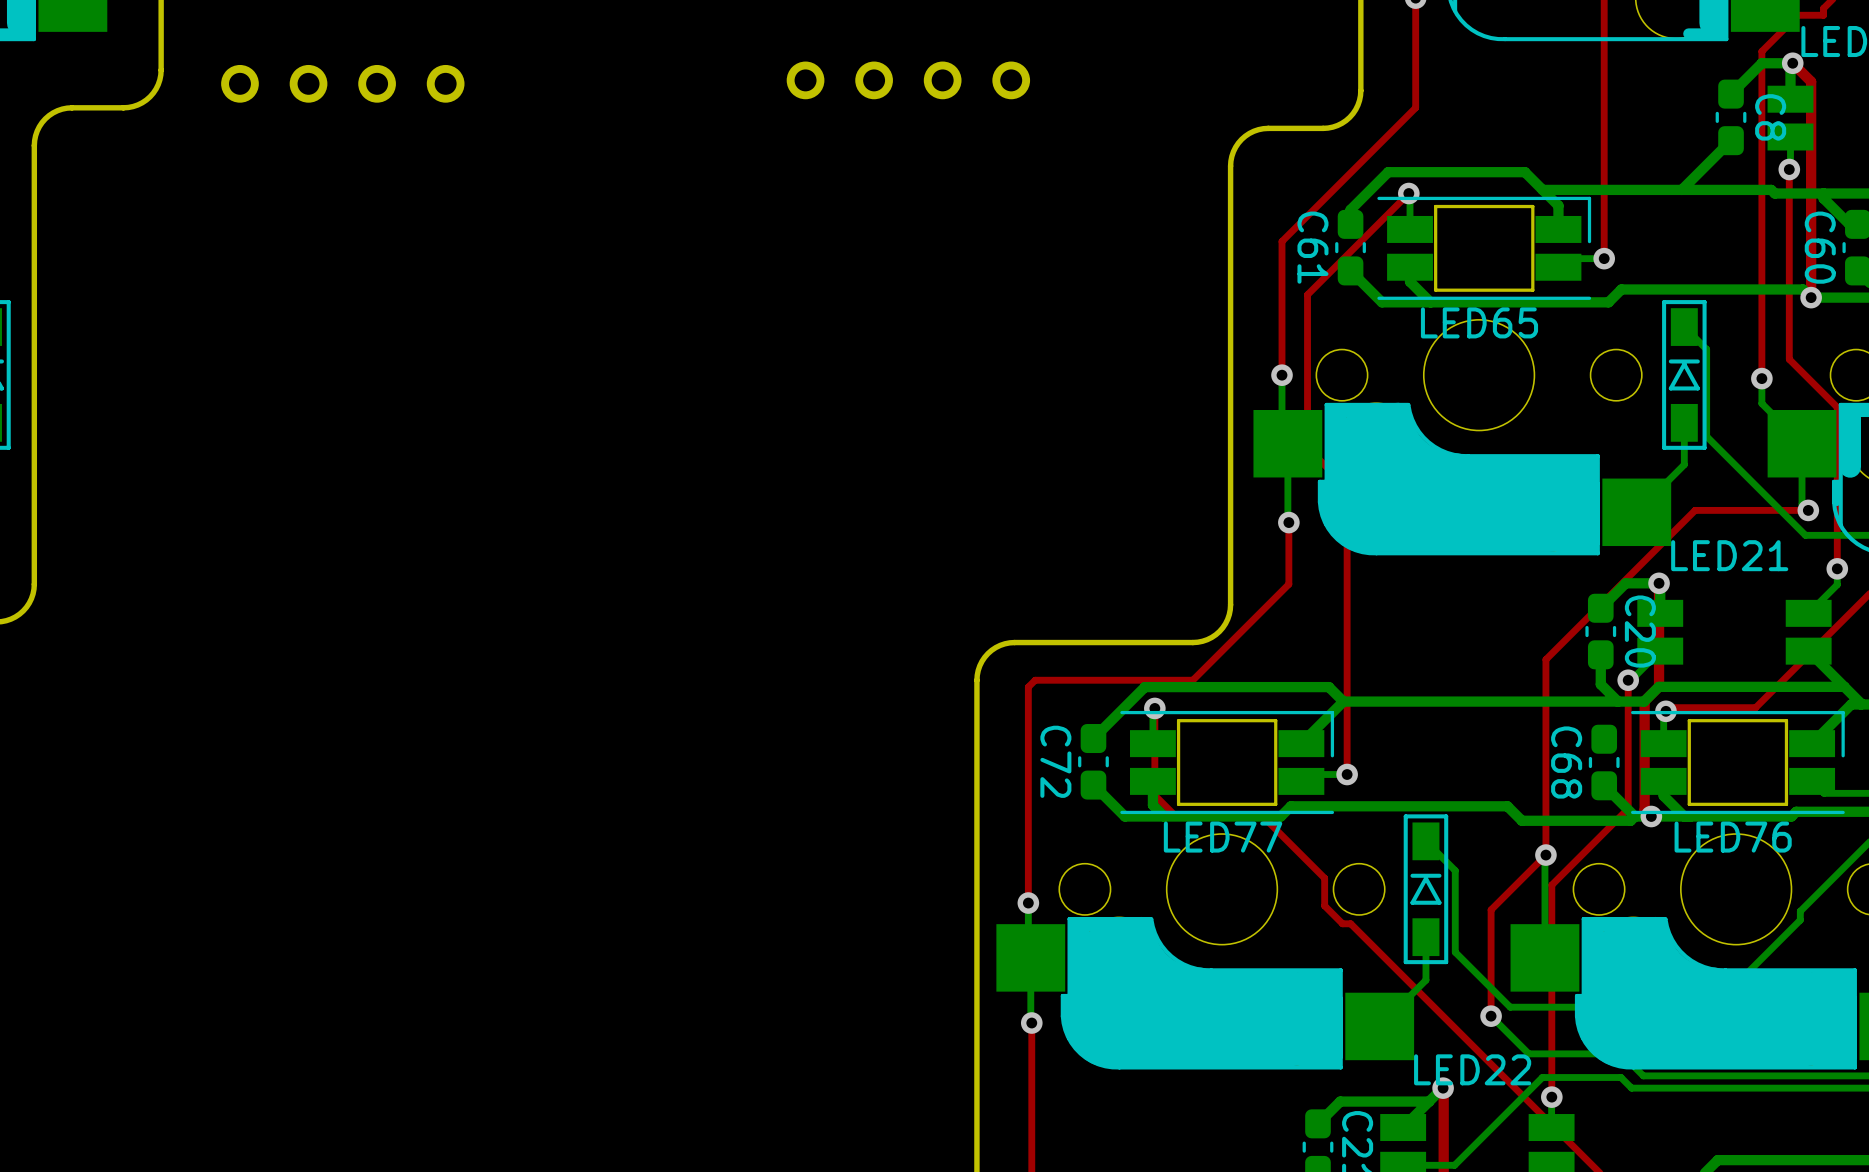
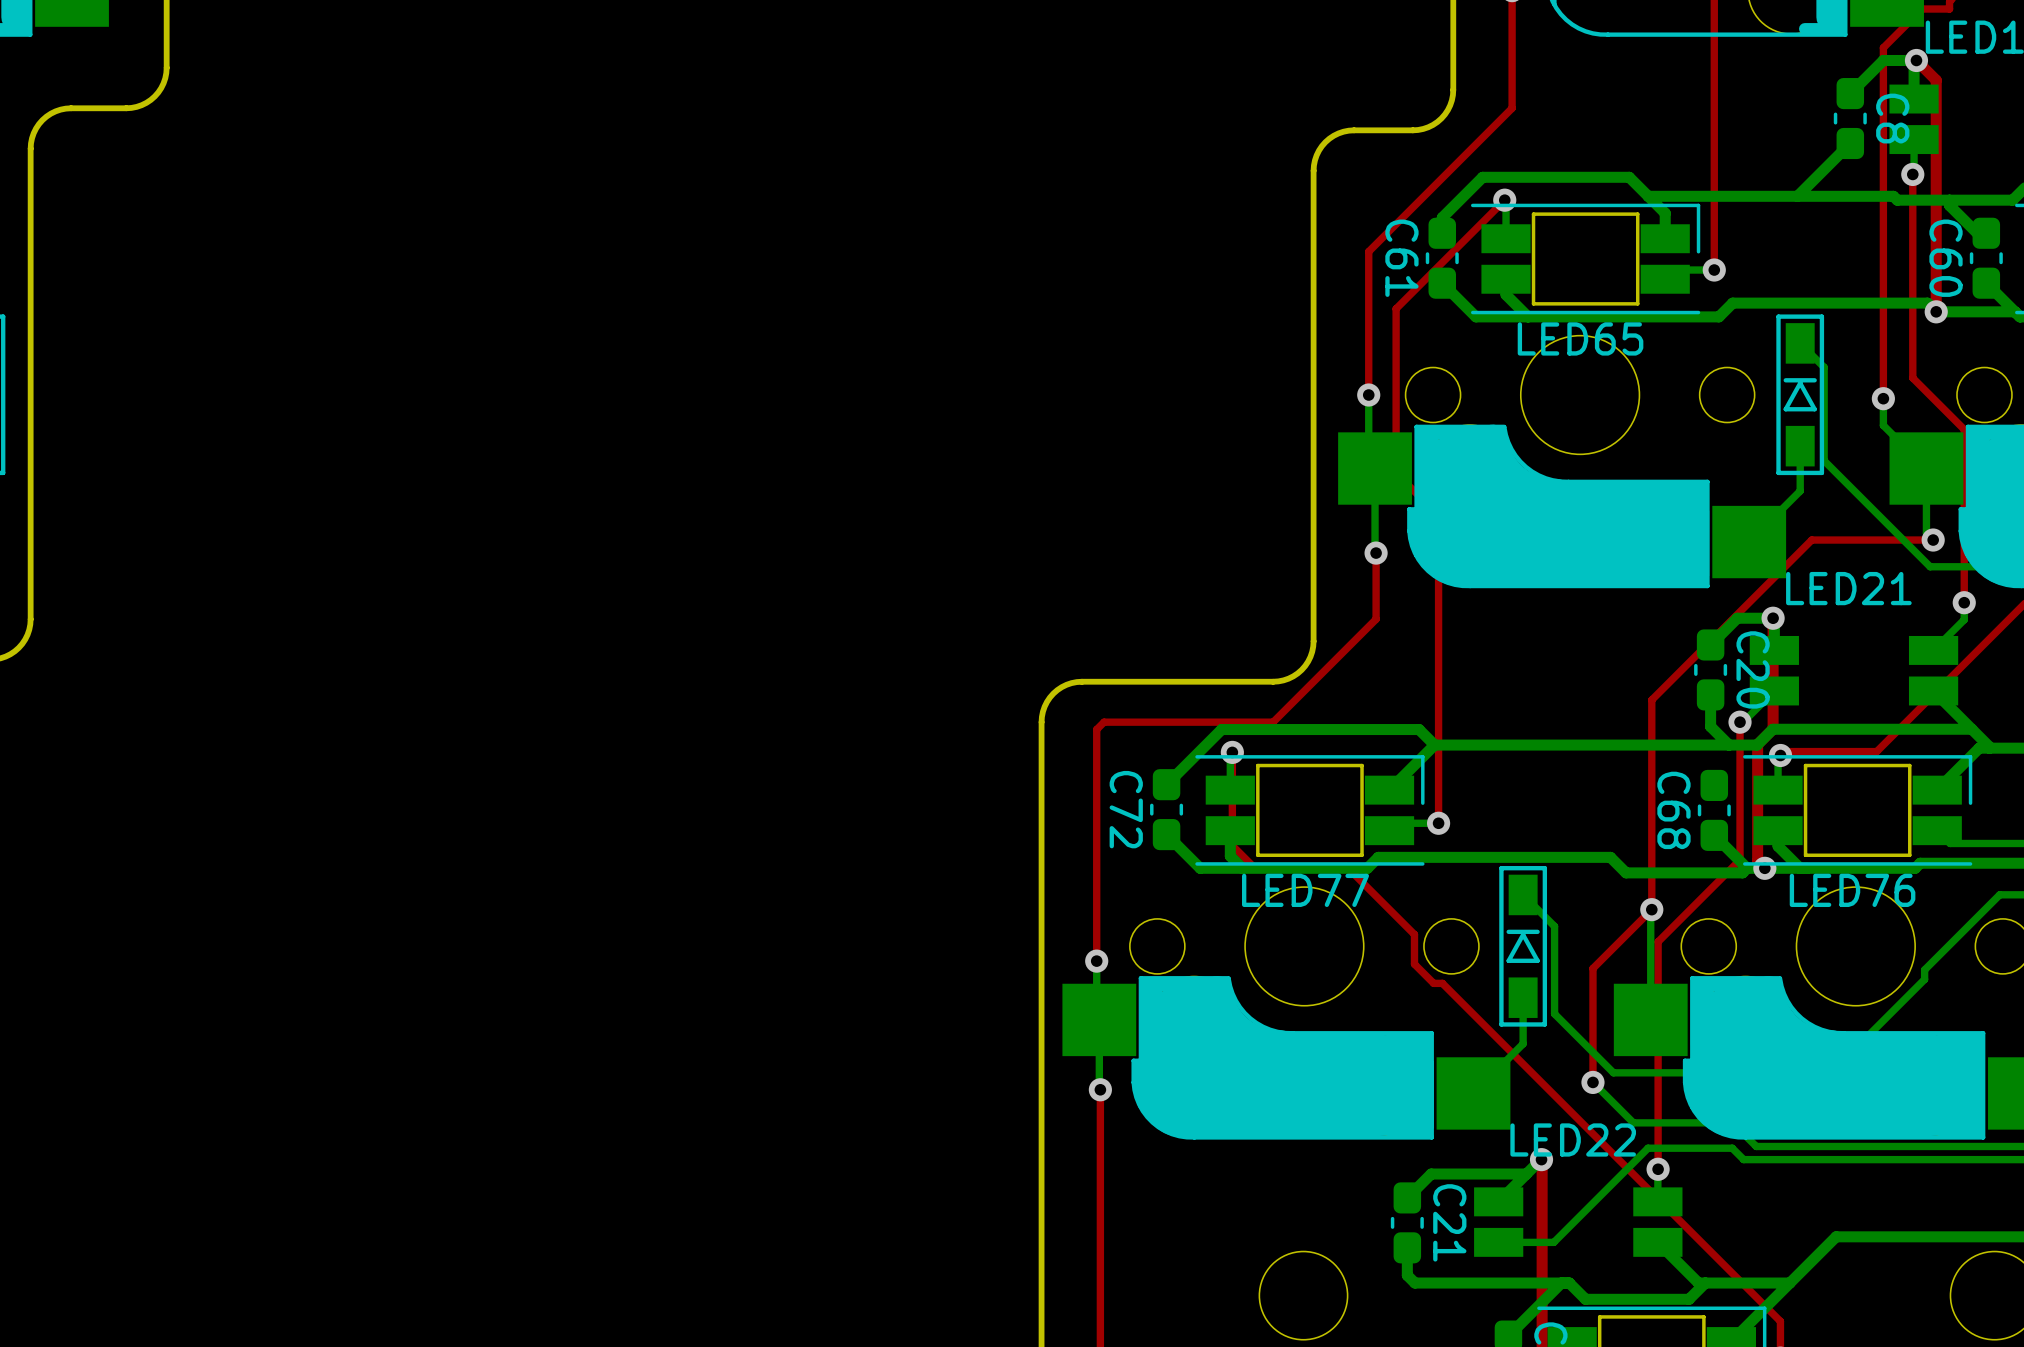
part: (908, 80) -> none
part: (342, 83) -> none

